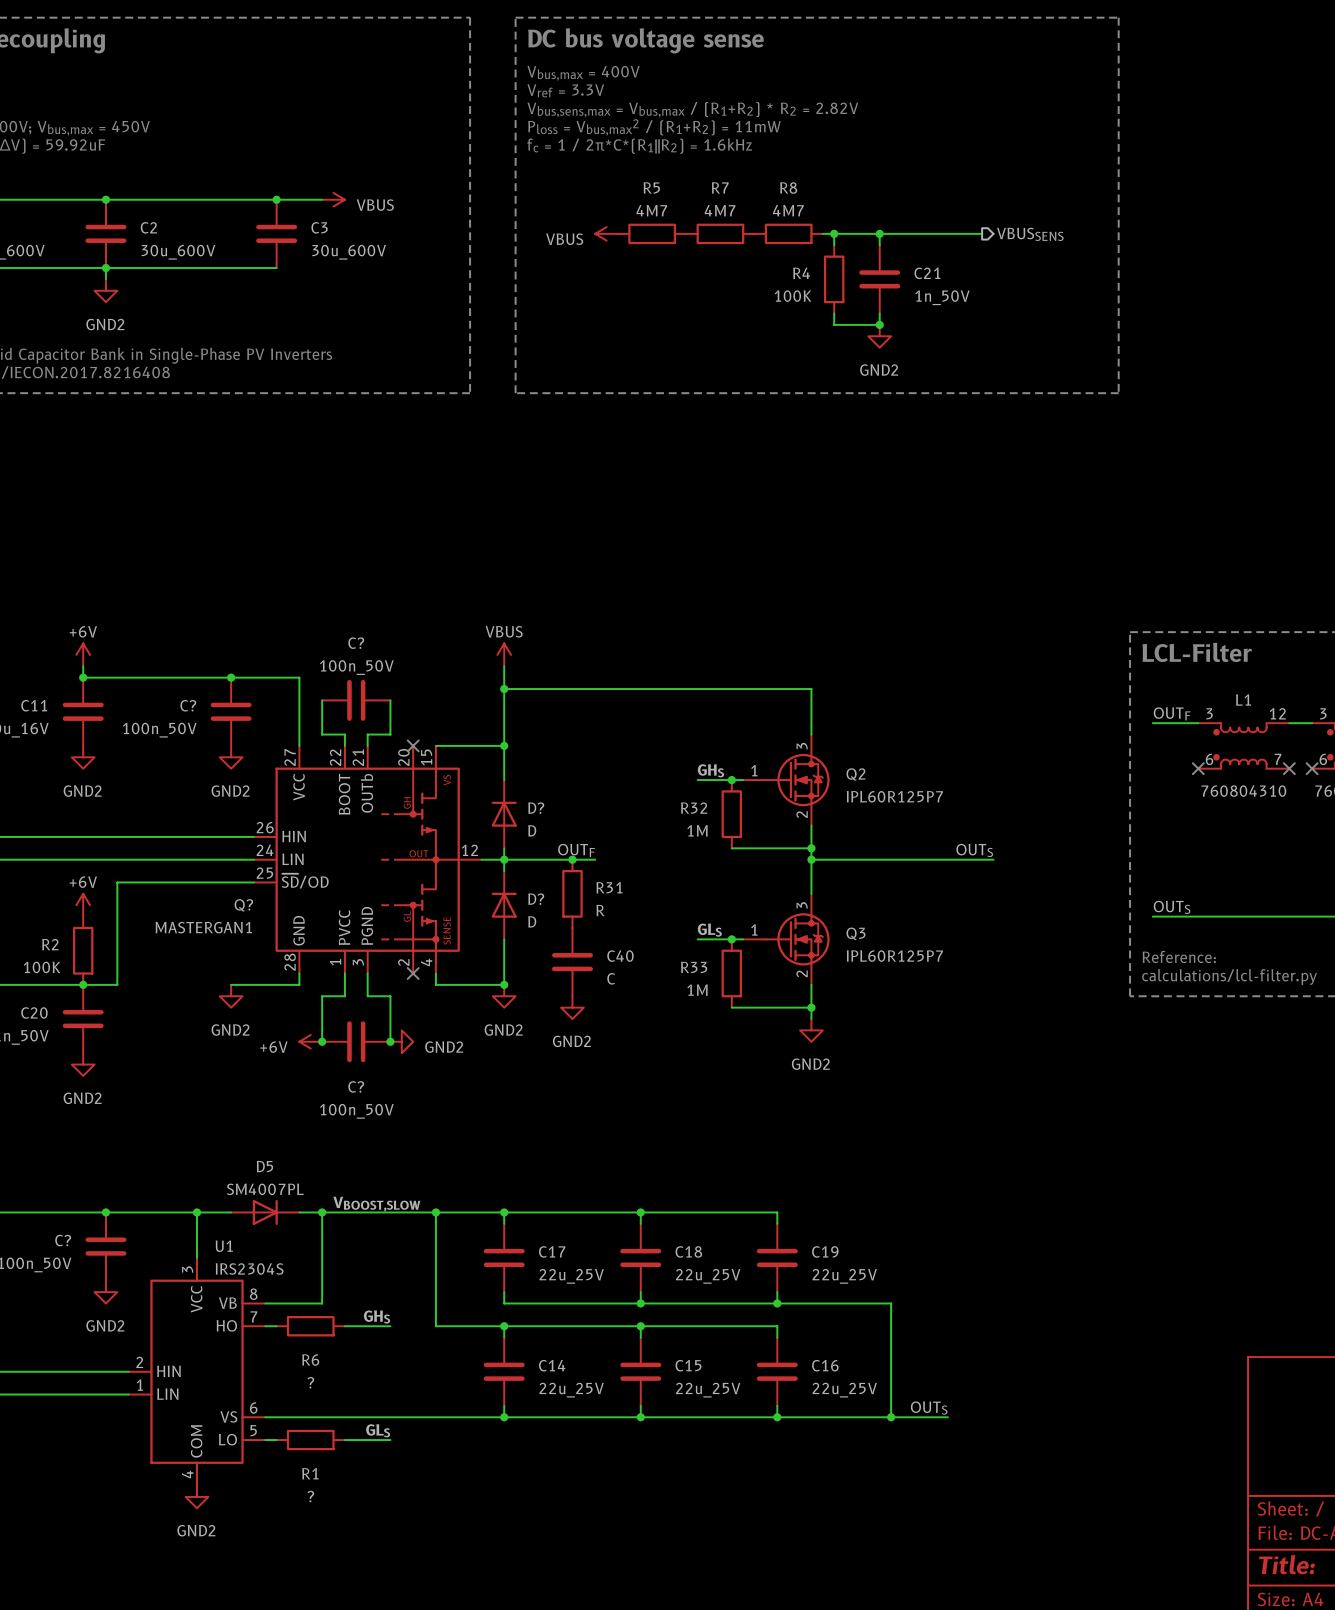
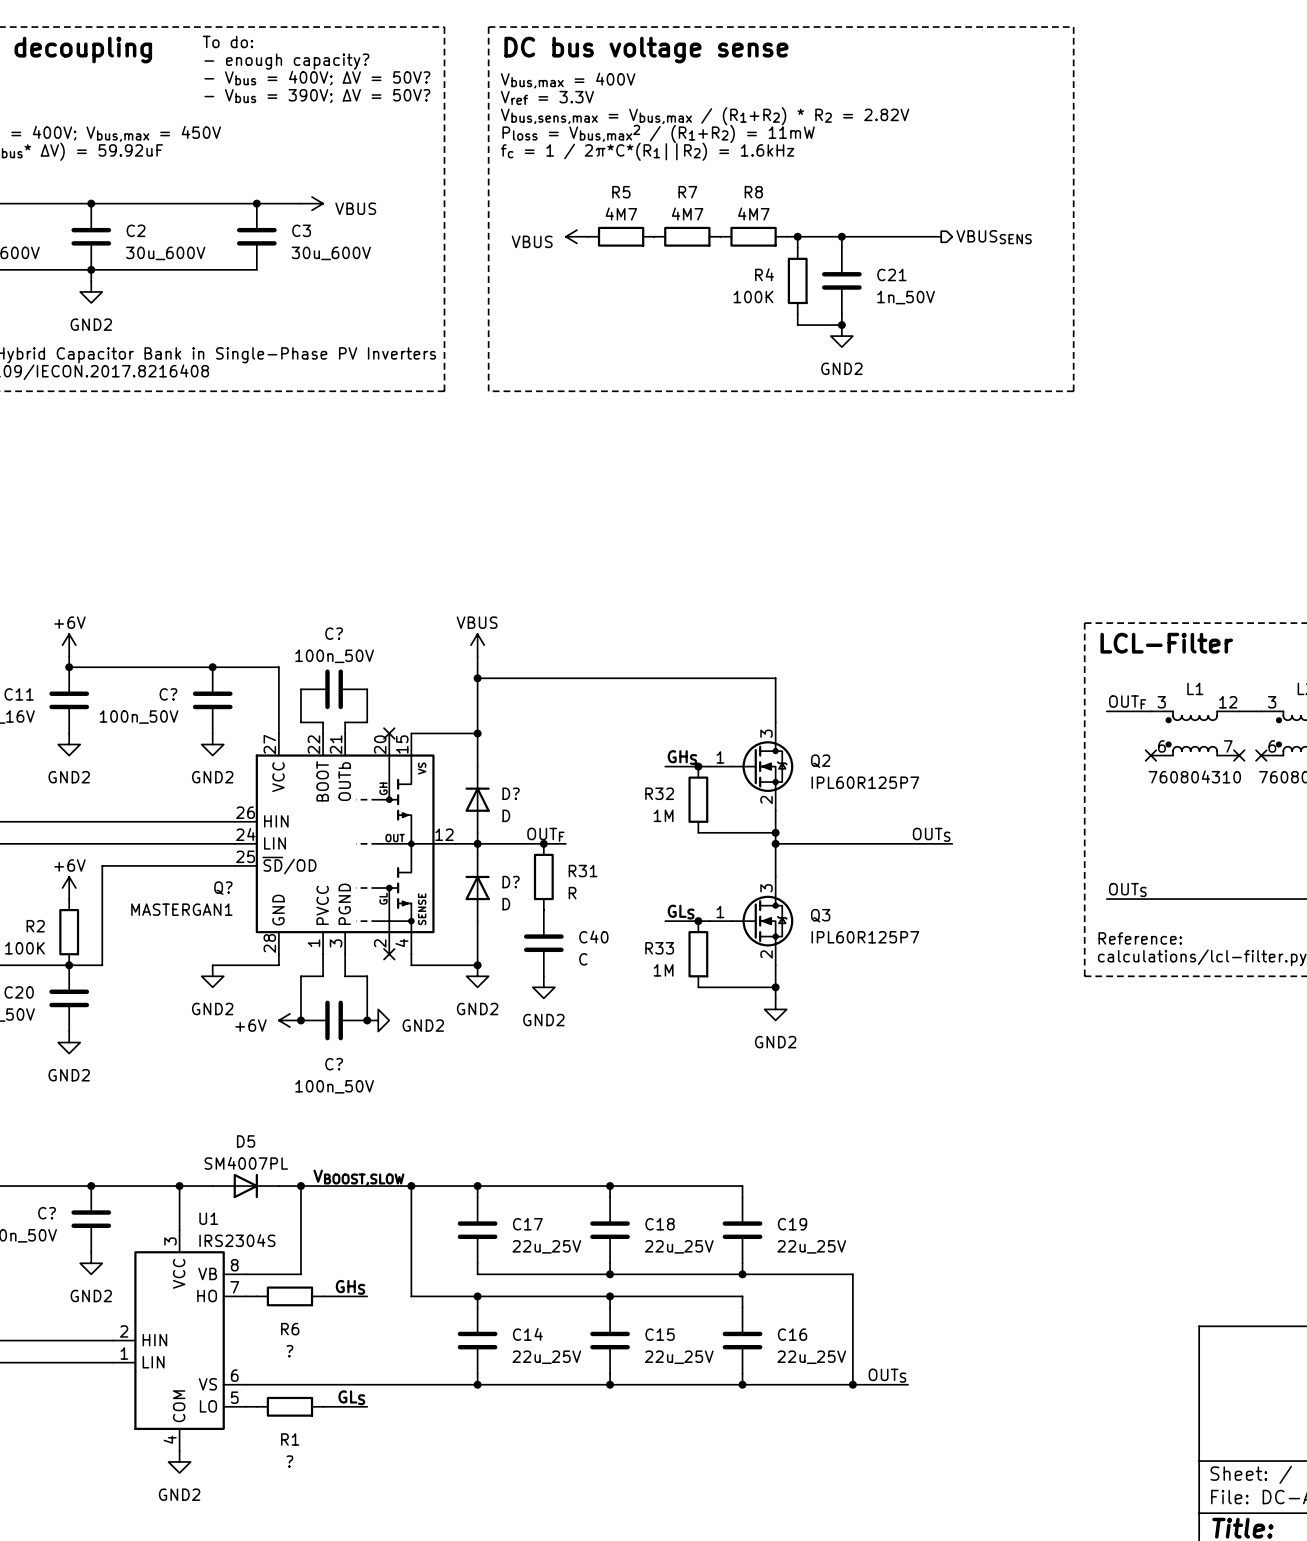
text: none -> To do: (228, 41)
text: none -> - enough capacity? (286, 61)
text: none -> - Vbus = 400V; ΔV = 50V? (317, 78)
text: none -> - Vbus = 390V; ΔV = 50V? (317, 96)

